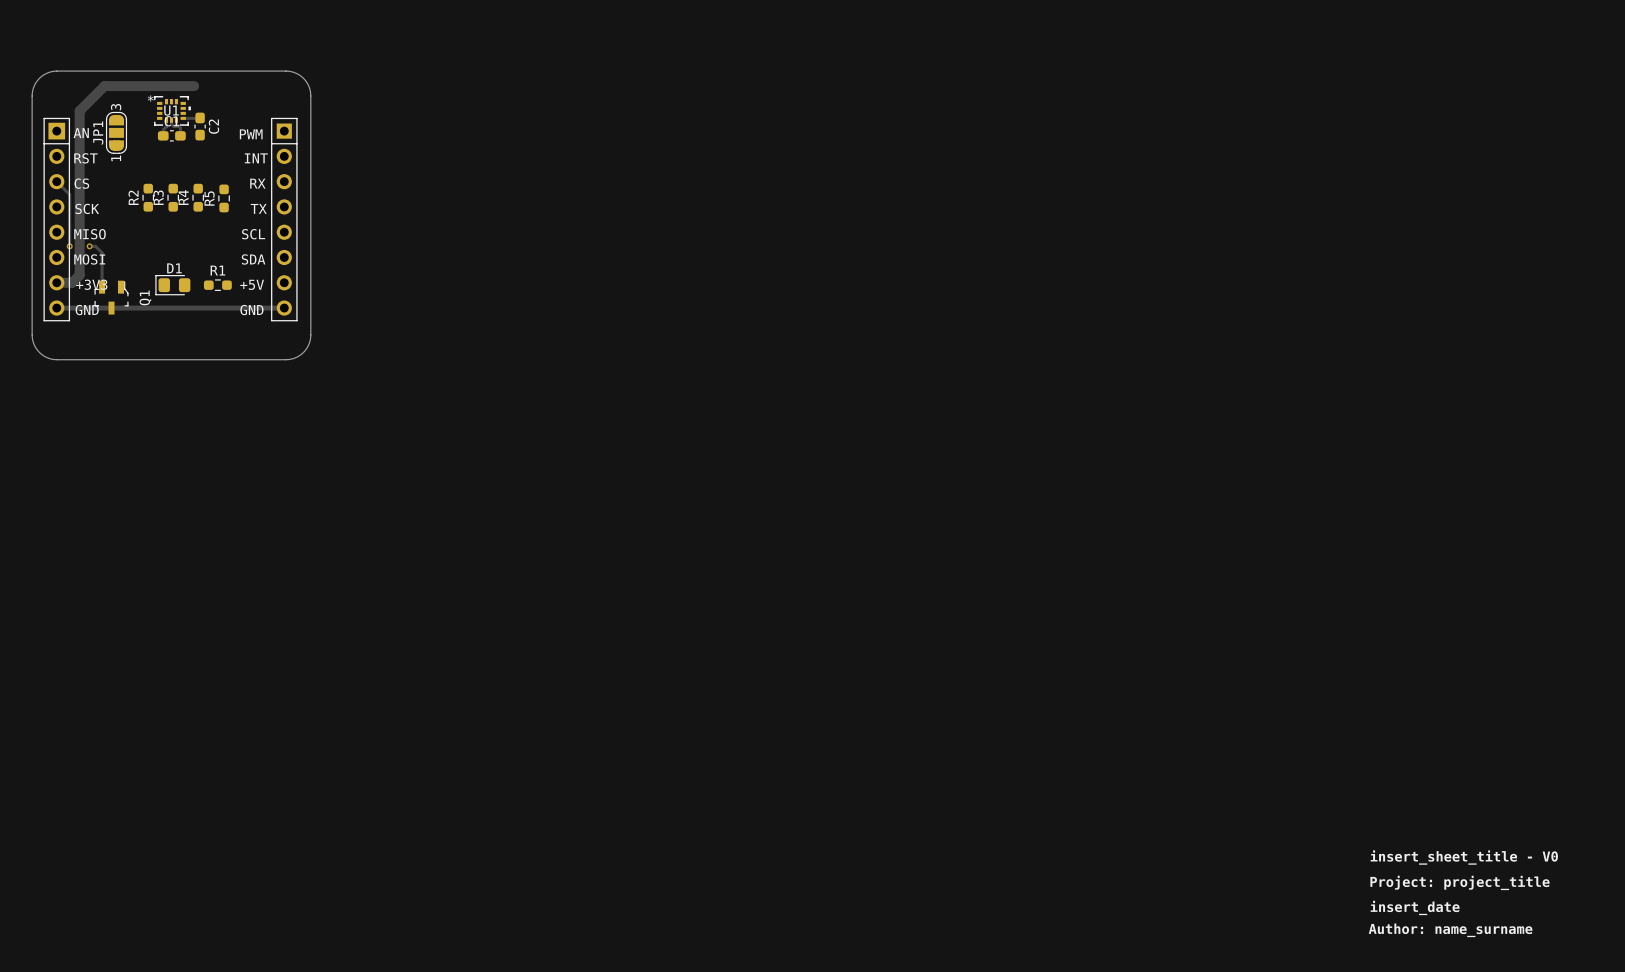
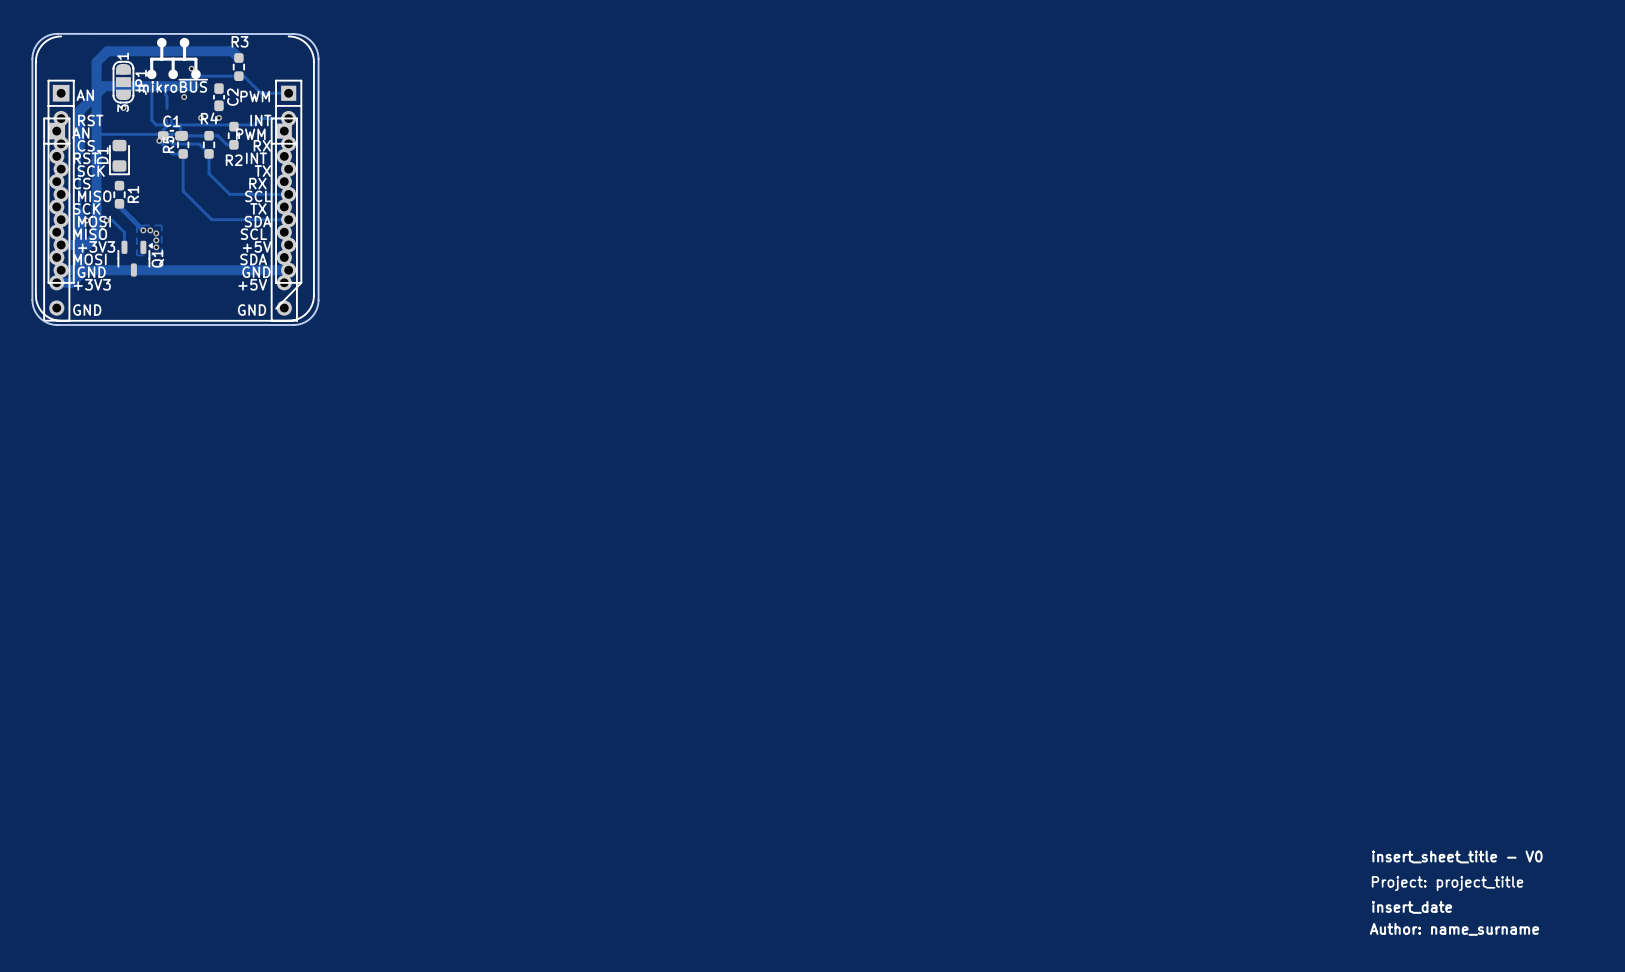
track: none -> (238, 57) (232, 51) (107, 51) (96, 62) (96, 235) (87, 244) (61, 244)
via: none -> (191, 68)
track: none -> (182, 81) (188, 81) (194, 76) (243, 76) (261, 93) (288, 93)
track: none -> (159, 86) (151, 88) (151, 120) (156, 124) (254, 124) (261, 118) (288, 118)
track: none -> (165, 88) (167, 108)
board edge: (310, 95) (308, 85) (303, 78) (288, 71) (57, 71) (46, 73) (39, 78) (34, 85) (32, 95) (32, 334) (34, 345) (39, 352) (48, 358) (57, 359) (285, 359) (294, 358) (303, 352) (309, 343) (310, 334) (310, 96) -> (318, 58) (318, 300) (317, 308) (311, 317) (301, 323) (293, 324) (57, 324) (49, 323) (39, 317) (34, 310) (32, 300) (32, 58) (34, 49) (39, 41) (47, 35) (57, 33) (296, 34) (304, 36) (313, 43) (317, 50) (318, 56) (318, 58)
via: none -> (184, 97)
via: none -> (123, 108)
U1: (172, 110) -> none
track: (200, 117) (183, 118) -> none
via: none -> (201, 117)
via: none -> (219, 117)
C2 position: (200, 126) -> (219, 97)
JP1 rotation: 0° (116, 132) -> 180° (123, 82)
JP1 position: (116, 132) -> (123, 82)
track: none -> (96, 134) (211, 135)
track: none -> (209, 135) (217, 135) (226, 144) (233, 144)
track: none -> (159, 140) (172, 153) (183, 153) (183, 191) (211, 219) (288, 219)
via: none -> (159, 140)
track: none -> (169, 140) (172, 144) (199, 144) (209, 153) (209, 173) (229, 194) (288, 194)
track width: thick (79, 149) (79, 213) -> thin (79, 149) (79, 213)
part: none -> (174, 178)
R2 name rotation: 0° (133, 197) -> 90° clockwise (234, 160)
R2 name position: R2 (133, 197) -> R2 (234, 160)
R2 position: (148, 197) -> (233, 135)
R3 name rotation: 0° (158, 197) -> 90° clockwise (240, 41)
R3 name position: R3 (158, 197) -> R3 (240, 41)
R3 position: (173, 197) -> (238, 67)
R4 name rotation: 0° (183, 197) -> 90° clockwise (209, 118)
R4 name position: R4 (183, 197) -> R4 (209, 118)
R4 position: (198, 197) -> (209, 144)
R5 position: (224, 198) -> (183, 144)
track: none -> (119, 203) (119, 206) (143, 230)
via: none -> (86, 220)
track: none -> (106, 220) (112, 220) (124, 232) (124, 247)
via: none -> (106, 220)
zone outline: none -> (136, 225) (161, 225) (161, 255) (136, 255) (136, 225)
via: none -> (143, 230)
via: none -> (150, 230)
via: none -> (156, 233)
via: none -> (156, 240)
via: (69, 246) -> none
track: (89, 246) (95, 246) (102, 252) (102, 287) -> none
via: (89, 246) -> none
via: none -> (156, 247)
track: none -> (61, 270) (288, 270)
Q1 footprint: [94, 280, 129, 315] -> [117, 240, 153, 277]
D1 rotation: 0° (172, 285) -> 90° counterclockwise (119, 157)
D1 position: (172, 285) -> (119, 157)
R1 rotation: 0° (217, 285) -> 90° clockwise (119, 194)
R1 position: (217, 285) -> (119, 194)
track: (56, 308) (284, 308) -> none

